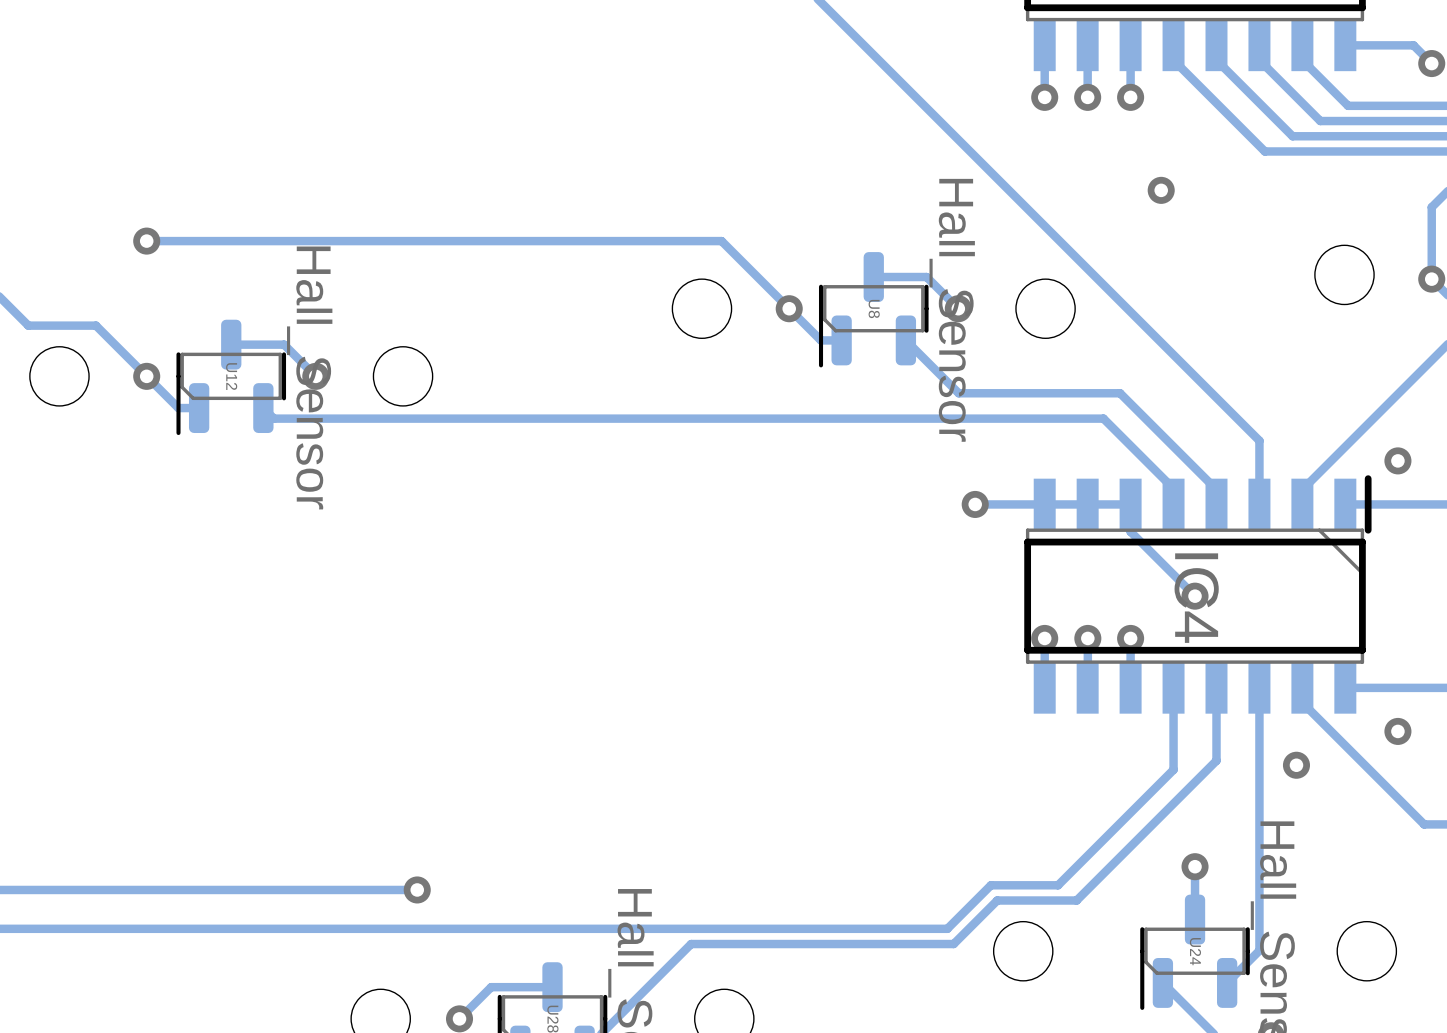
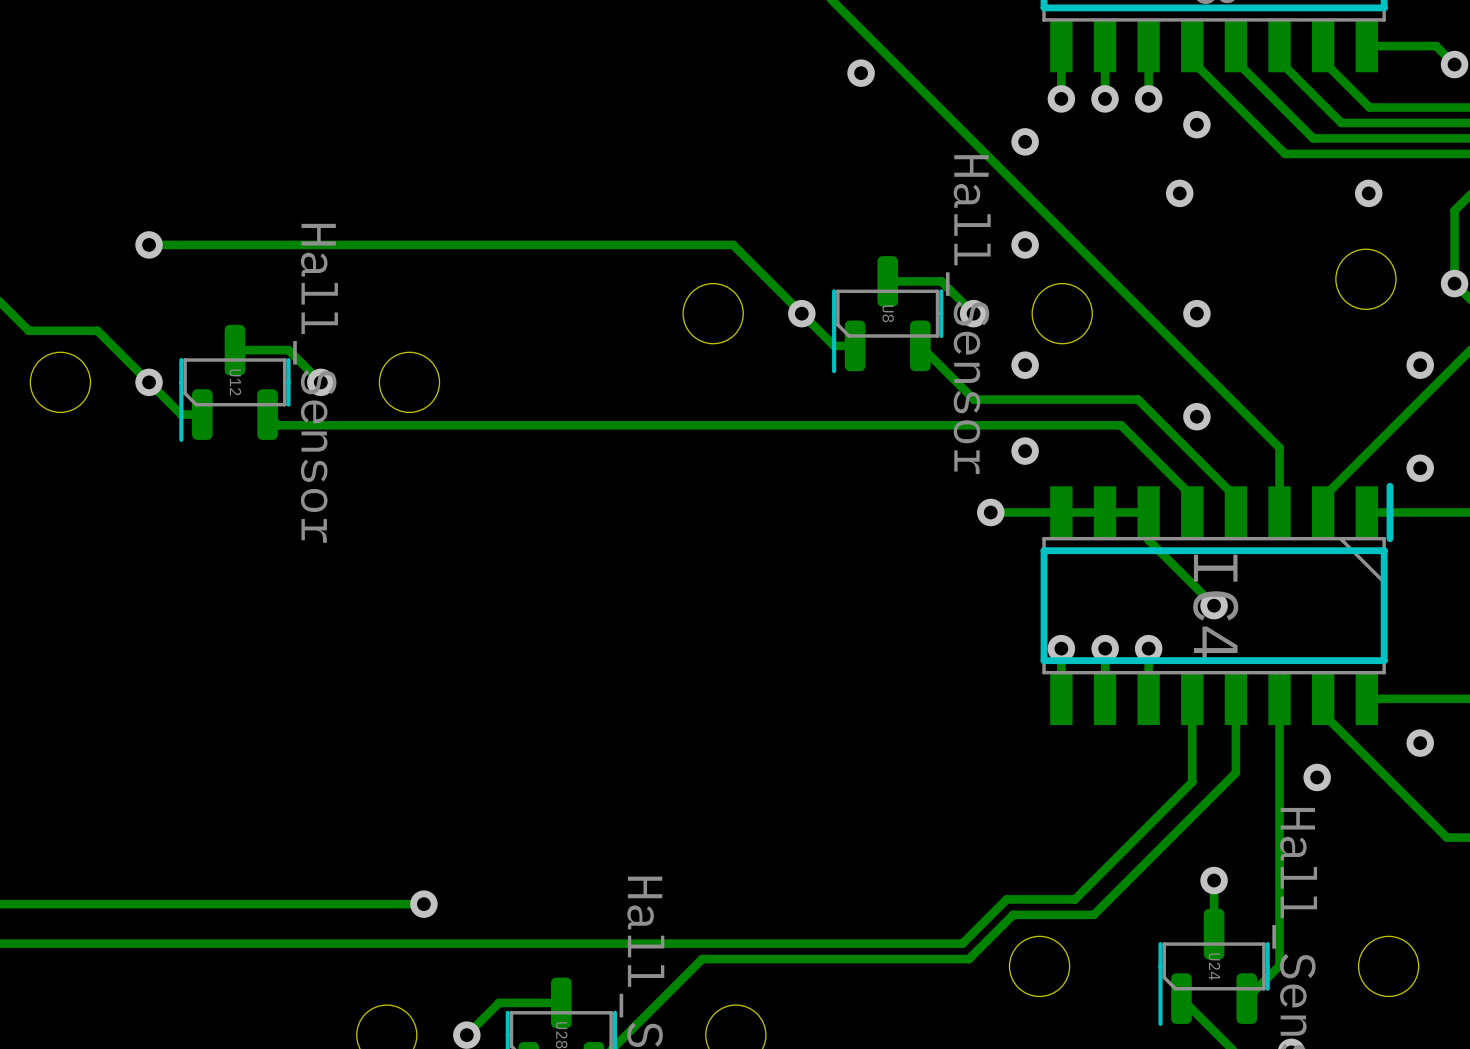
via: none -> (861, 73)
via: none -> (1196, 124)
via: none -> (1025, 141)
via: none -> (1368, 193)
via: none -> (1025, 244)
via: none -> (1196, 313)
via: none -> (1025, 365)
via: none -> (1420, 365)
via: none -> (1196, 416)
via: none -> (1025, 451)

